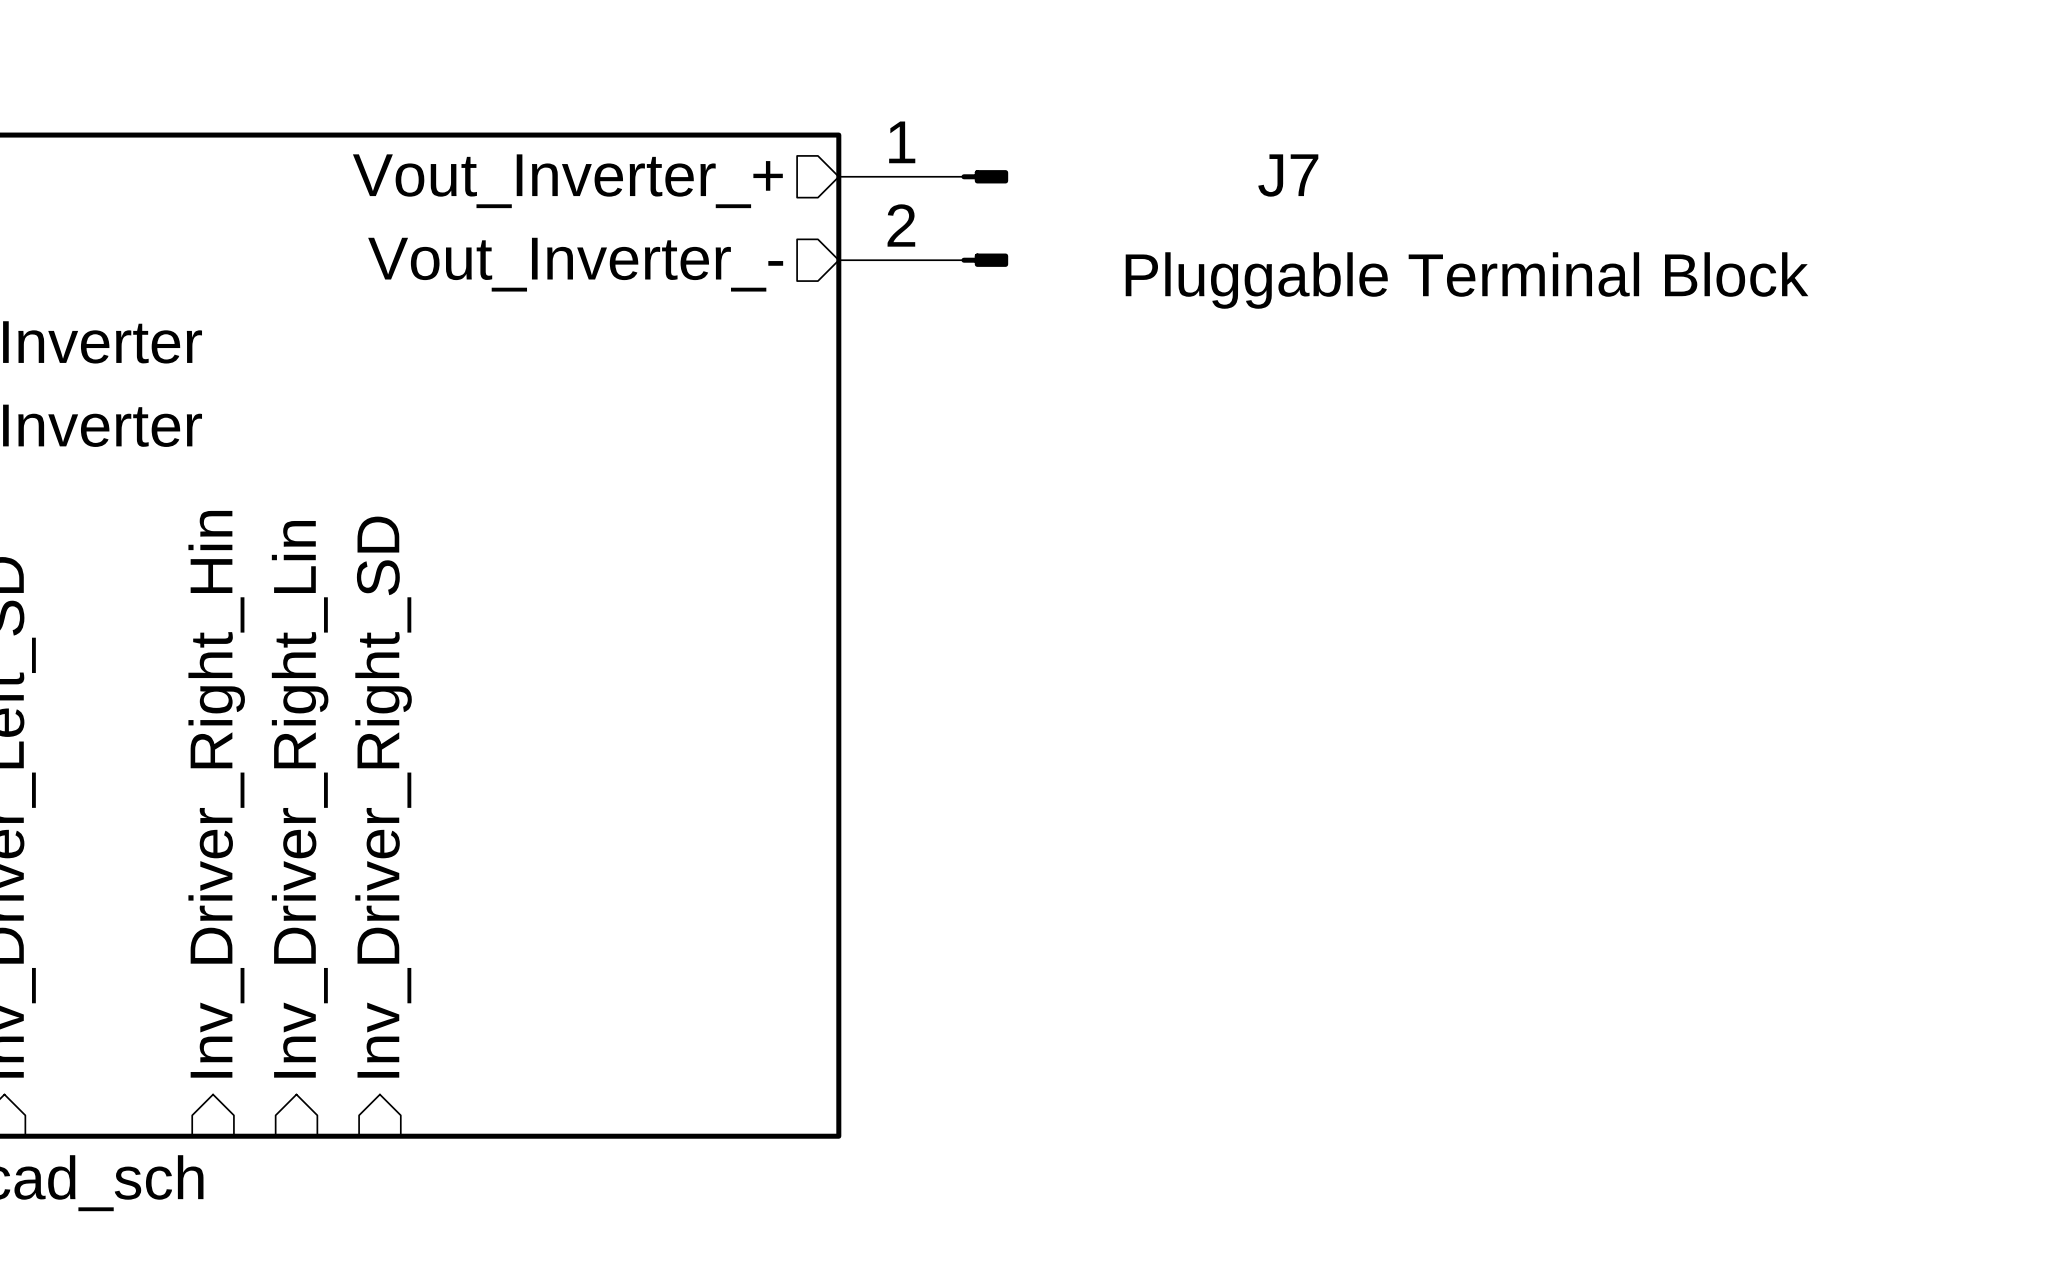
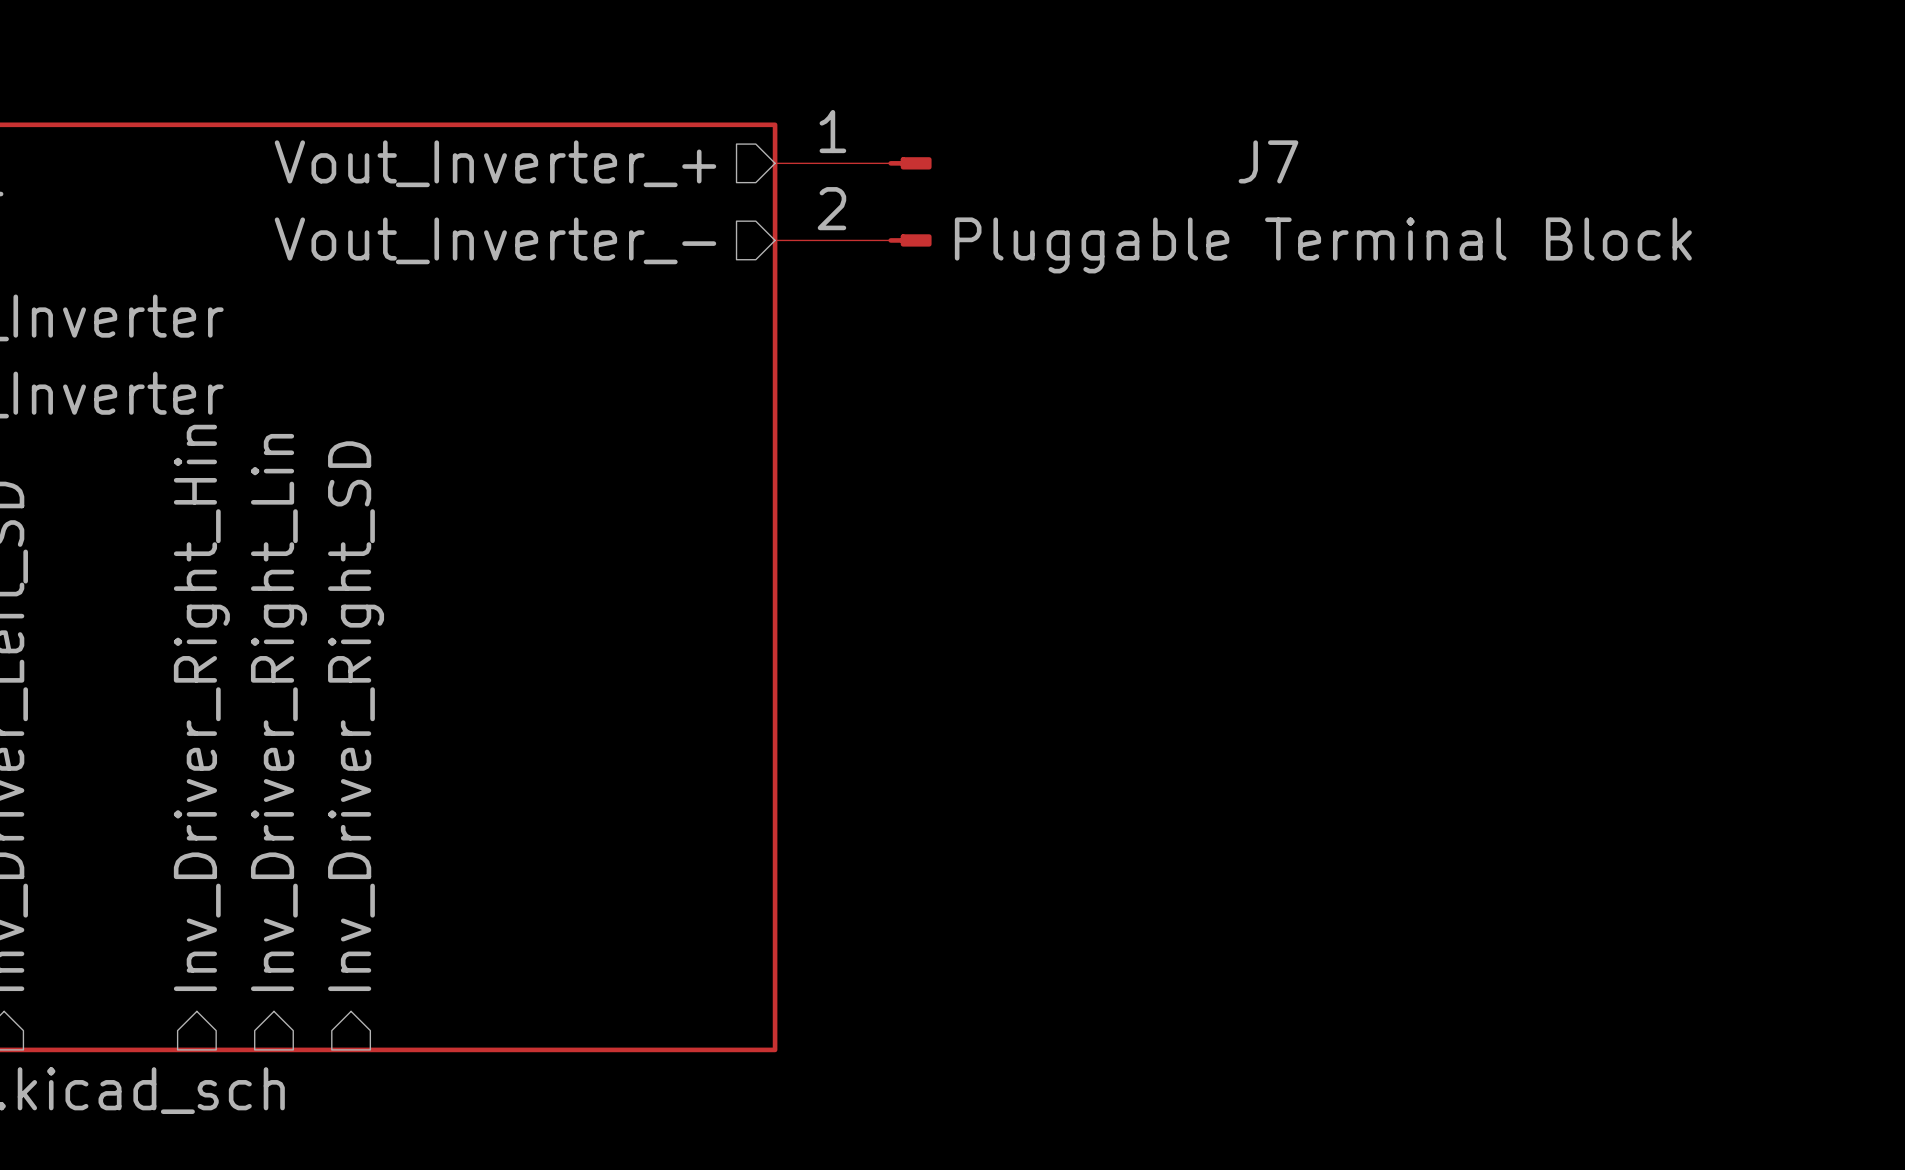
J7 name position: J7 (1288, 175) -> J7 (1268, 161)
J7 value position: Pluggable Terminal Block (1467, 280) -> Pluggable Terminal Block (1323, 245)

